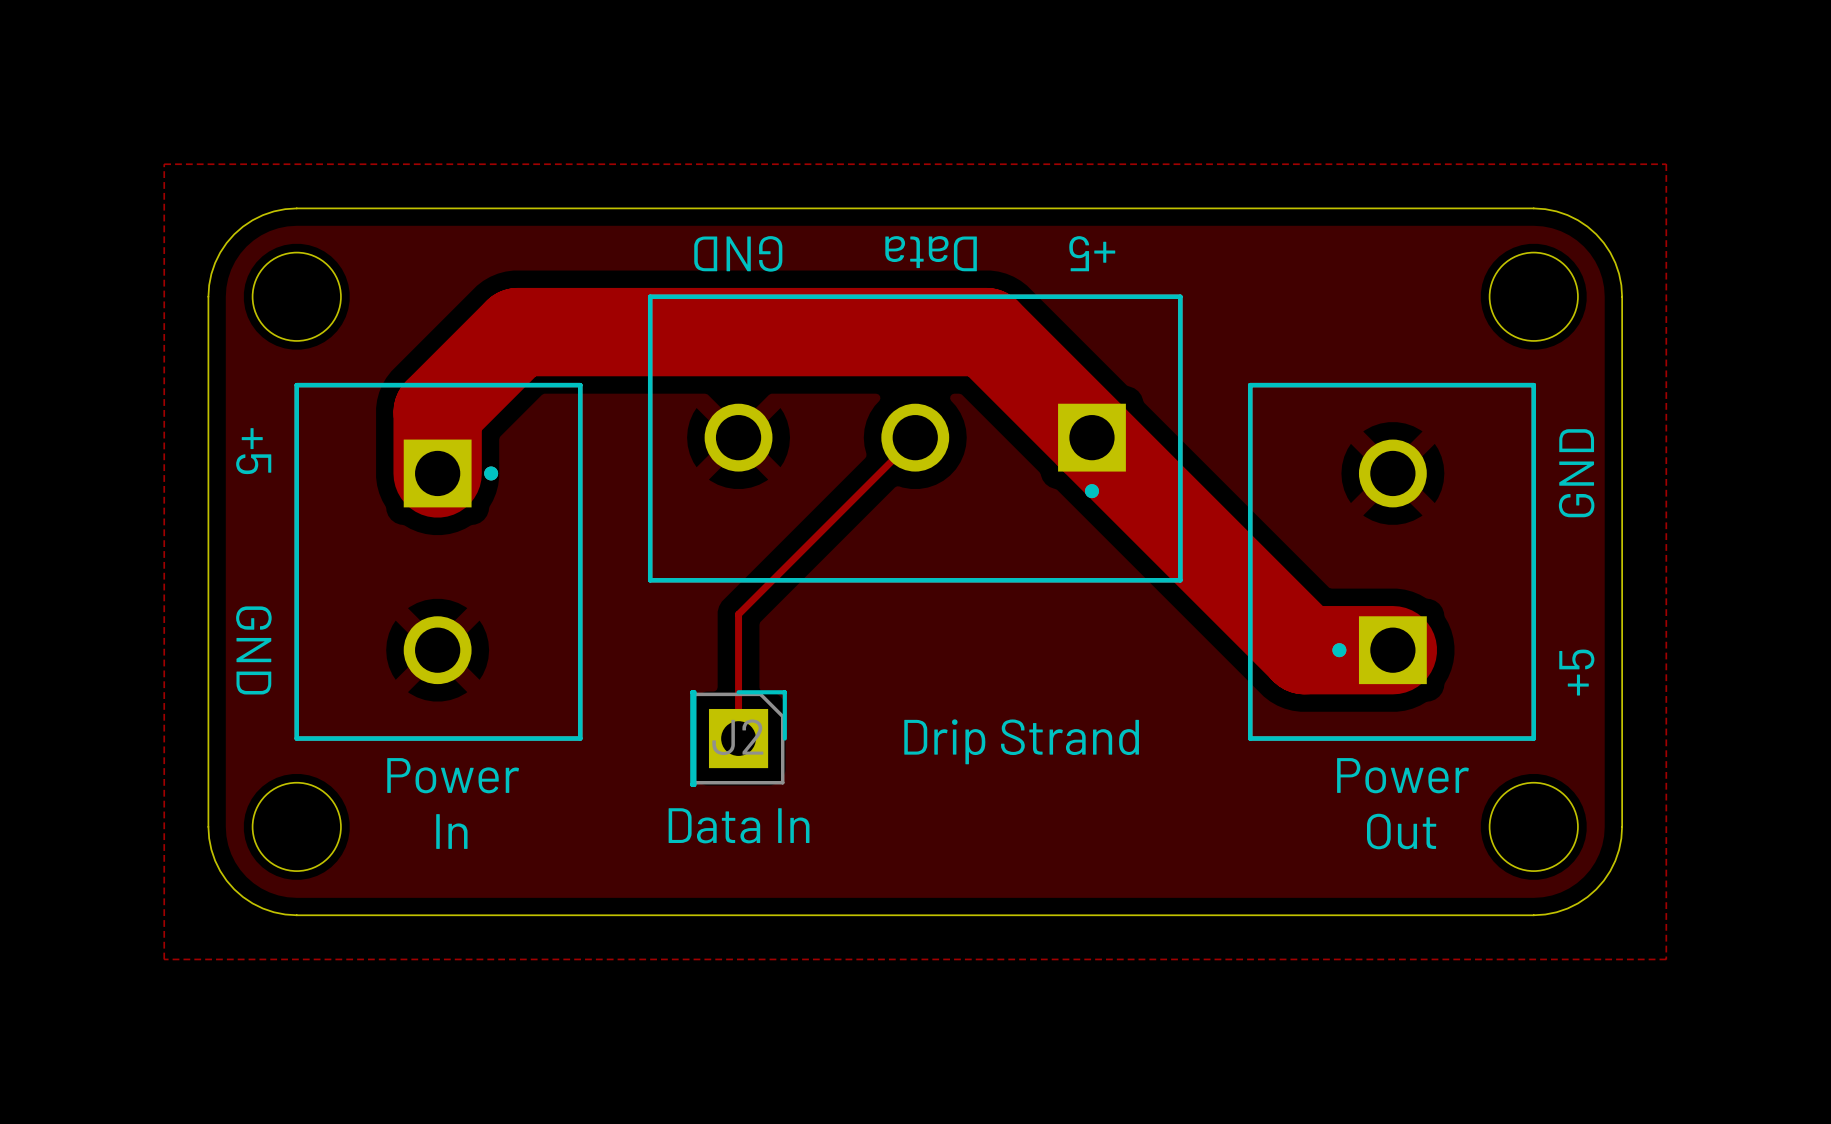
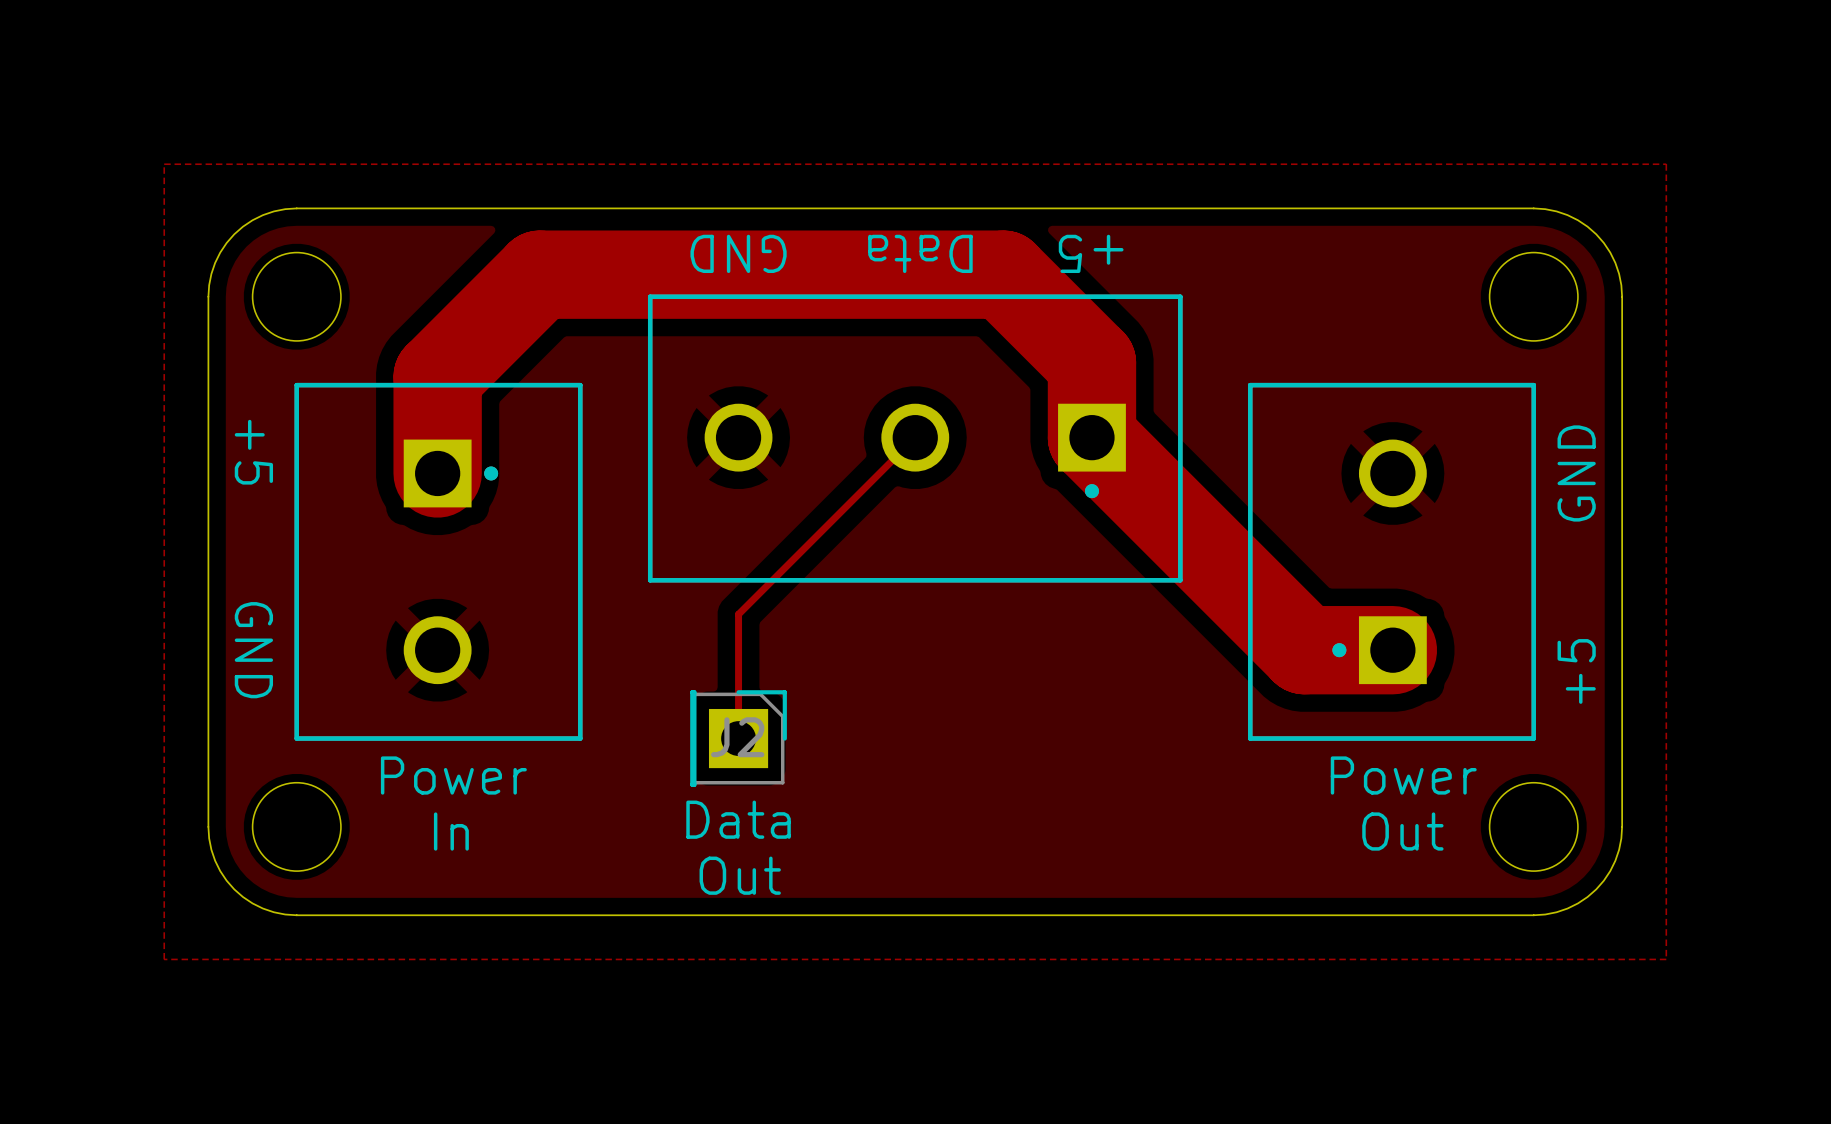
track: (437, 412) (517, 332) (986, 332) (1091, 437) -> (437, 412) (437, 376) (539, 274) (1003, 274) (1091, 363) (1091, 437)
text: Drip Strand (1021, 741) -> none
text: Data In (739, 825) -> Data (738, 819)
text: none -> Out (740, 875)

